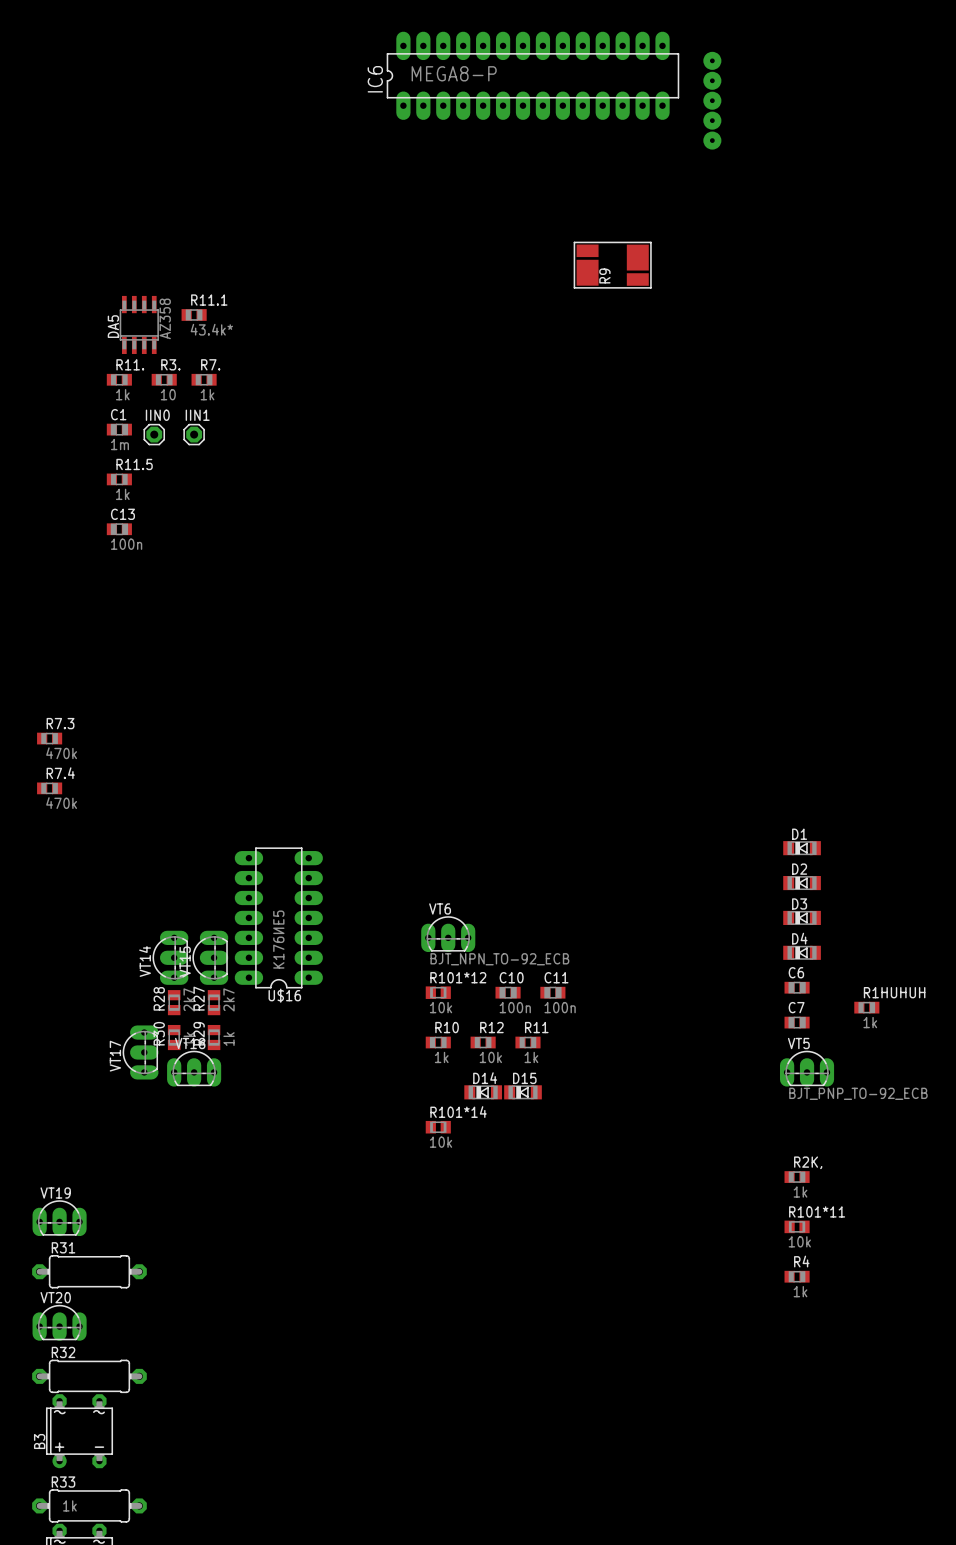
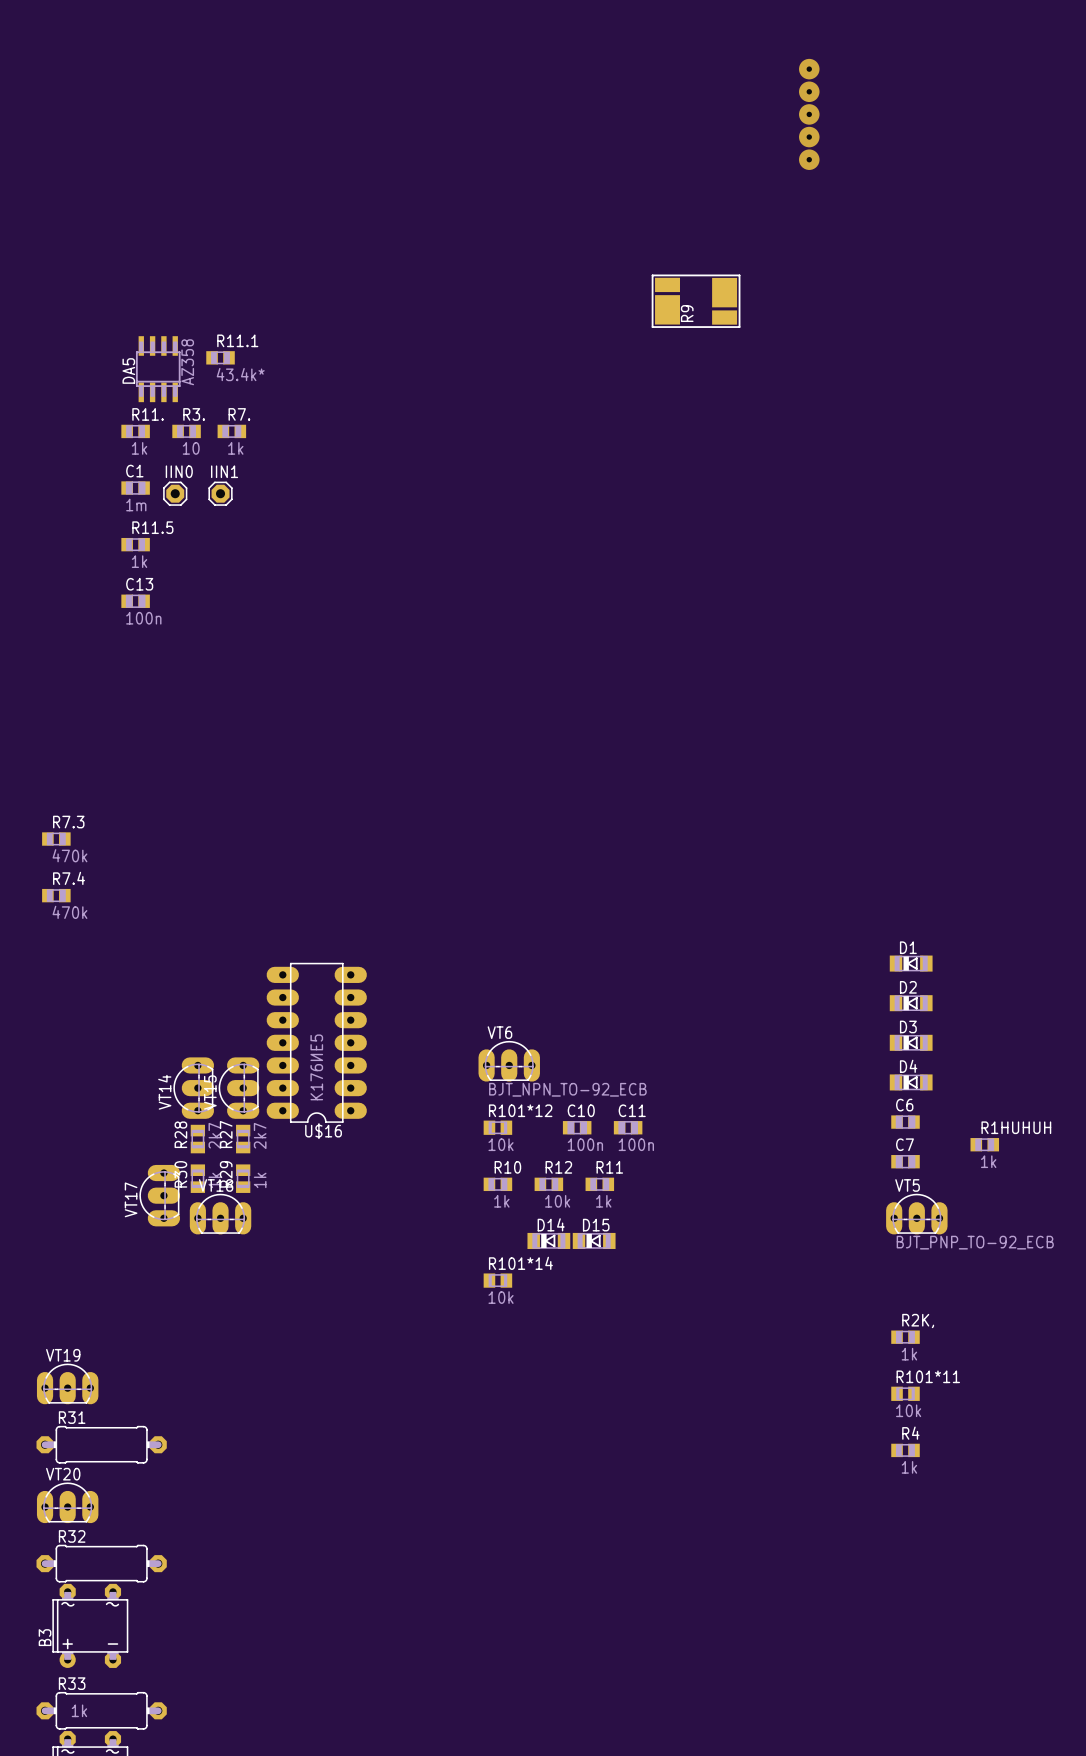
IC6: MEGA8-P (532, 75) -> none

